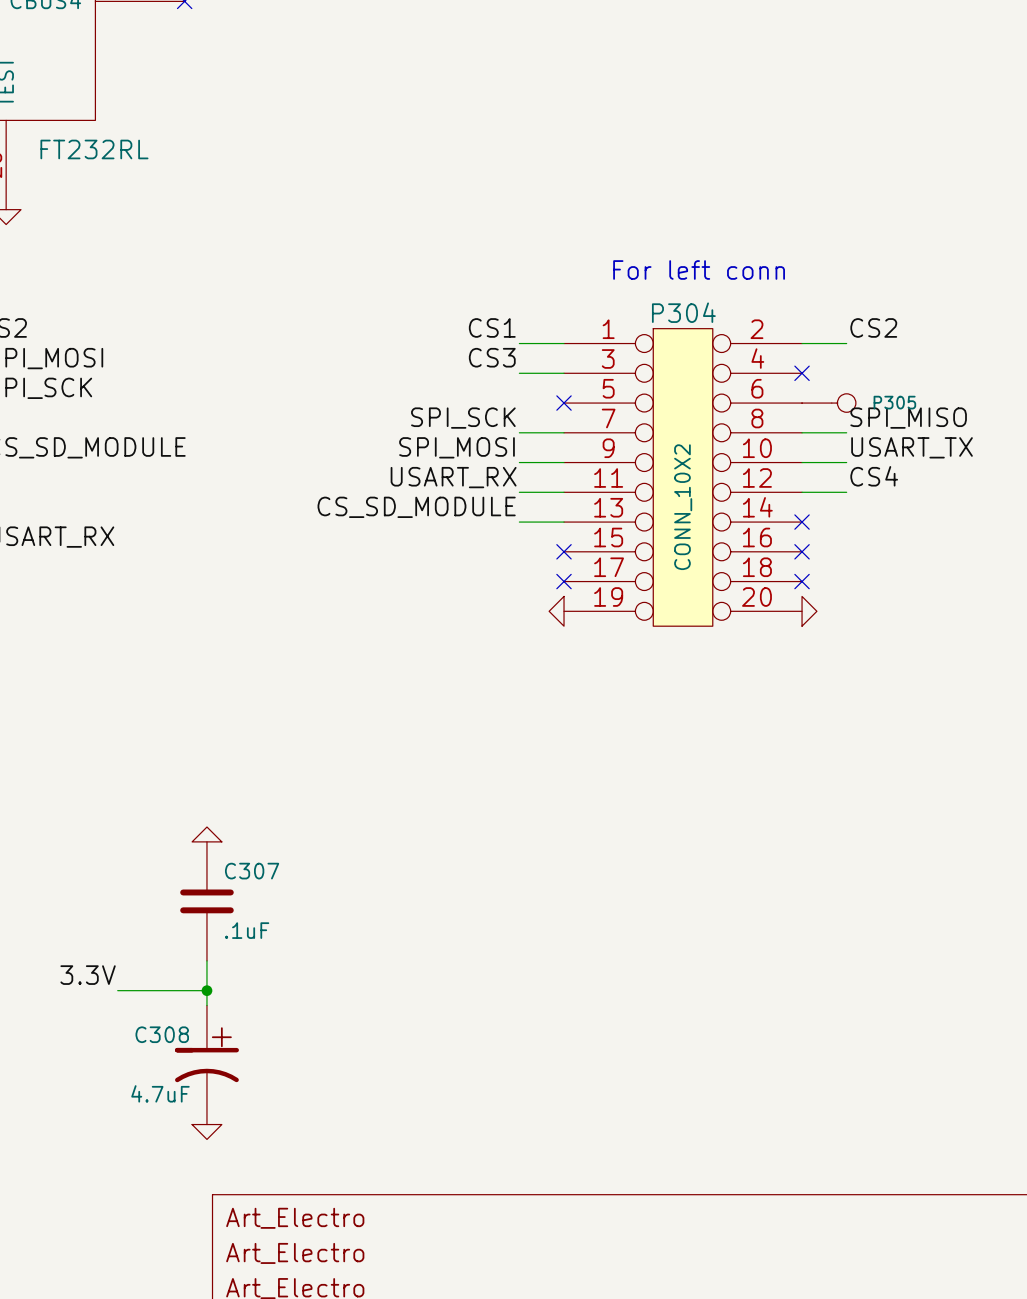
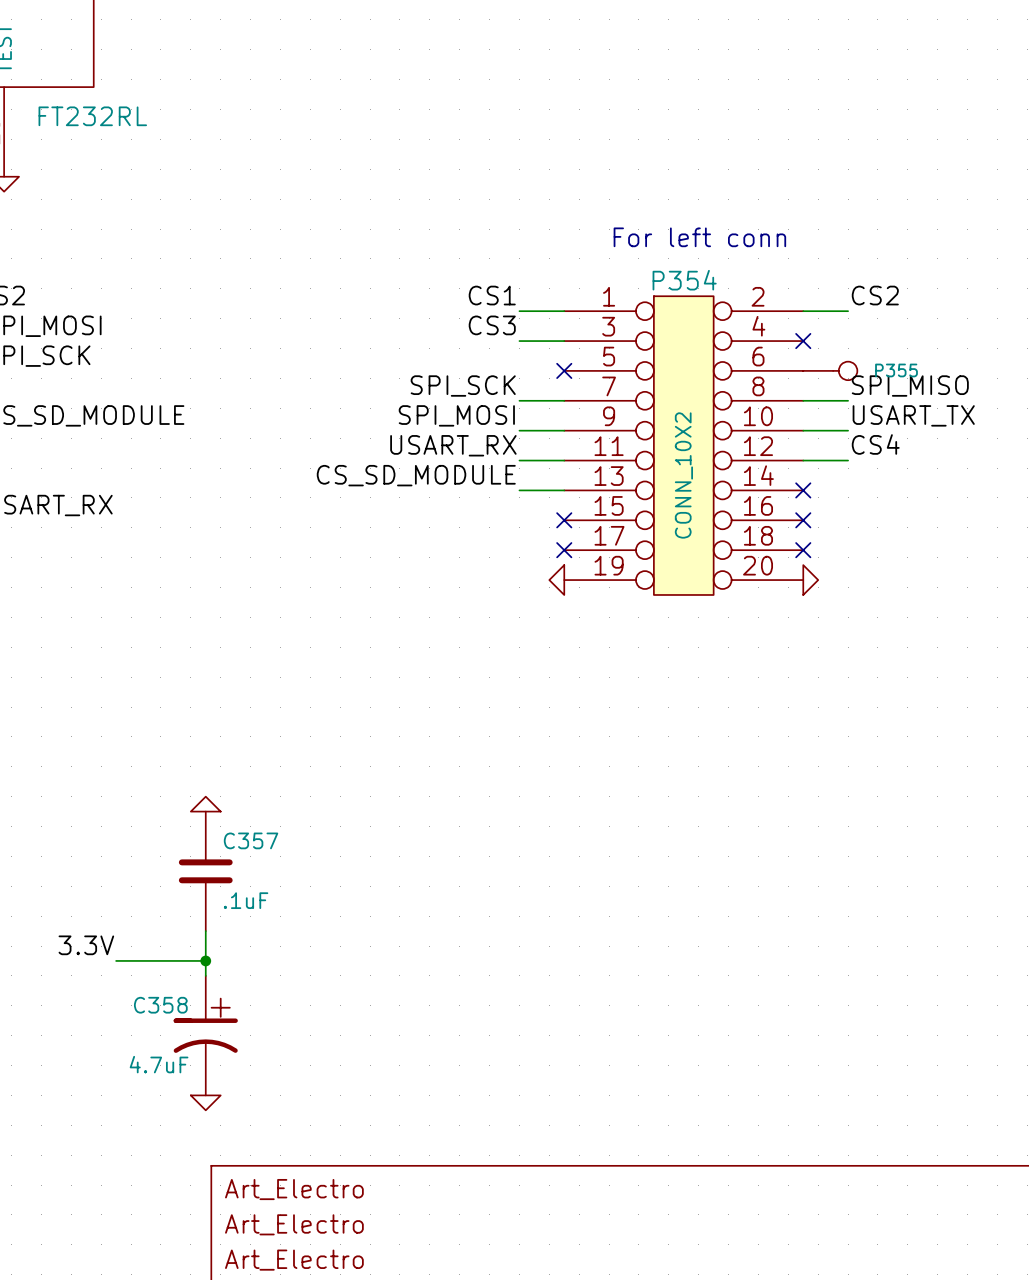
P304 name: P304 (683, 312) -> P354 (684, 280)
P305 name: P305 (894, 402) -> P355 (896, 370)
C307 name: C307 (252, 871) -> C357 (251, 840)
C308 name: C308 (162, 1034) -> C358 (160, 1005)

